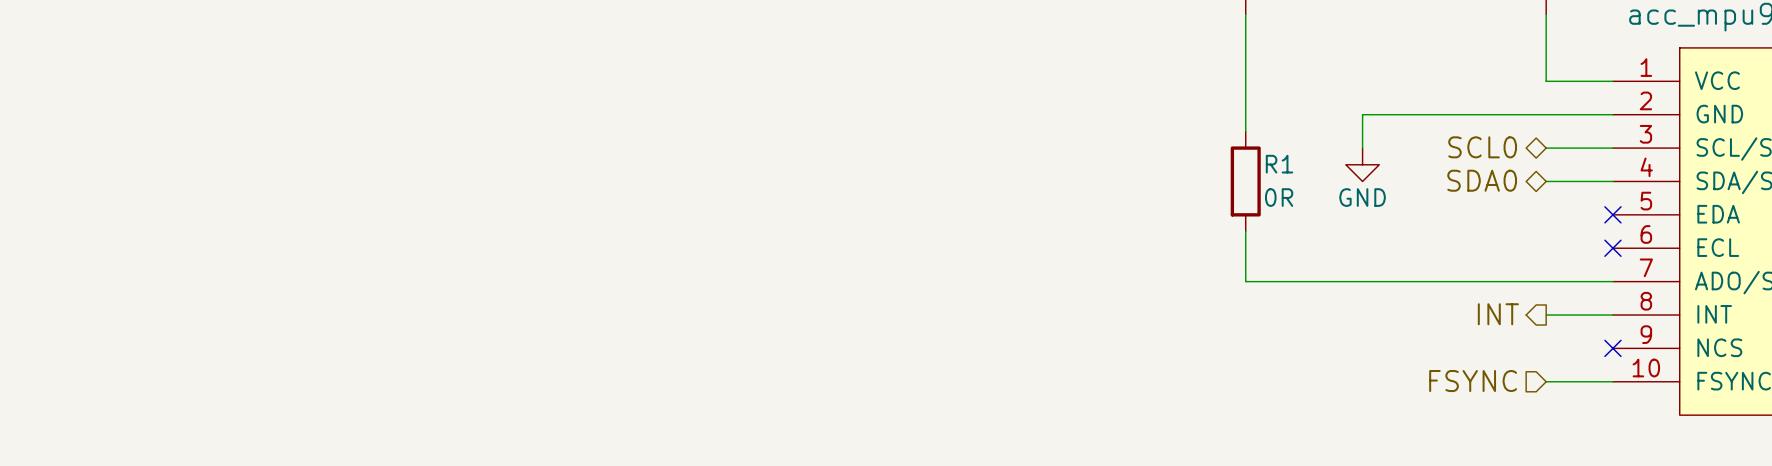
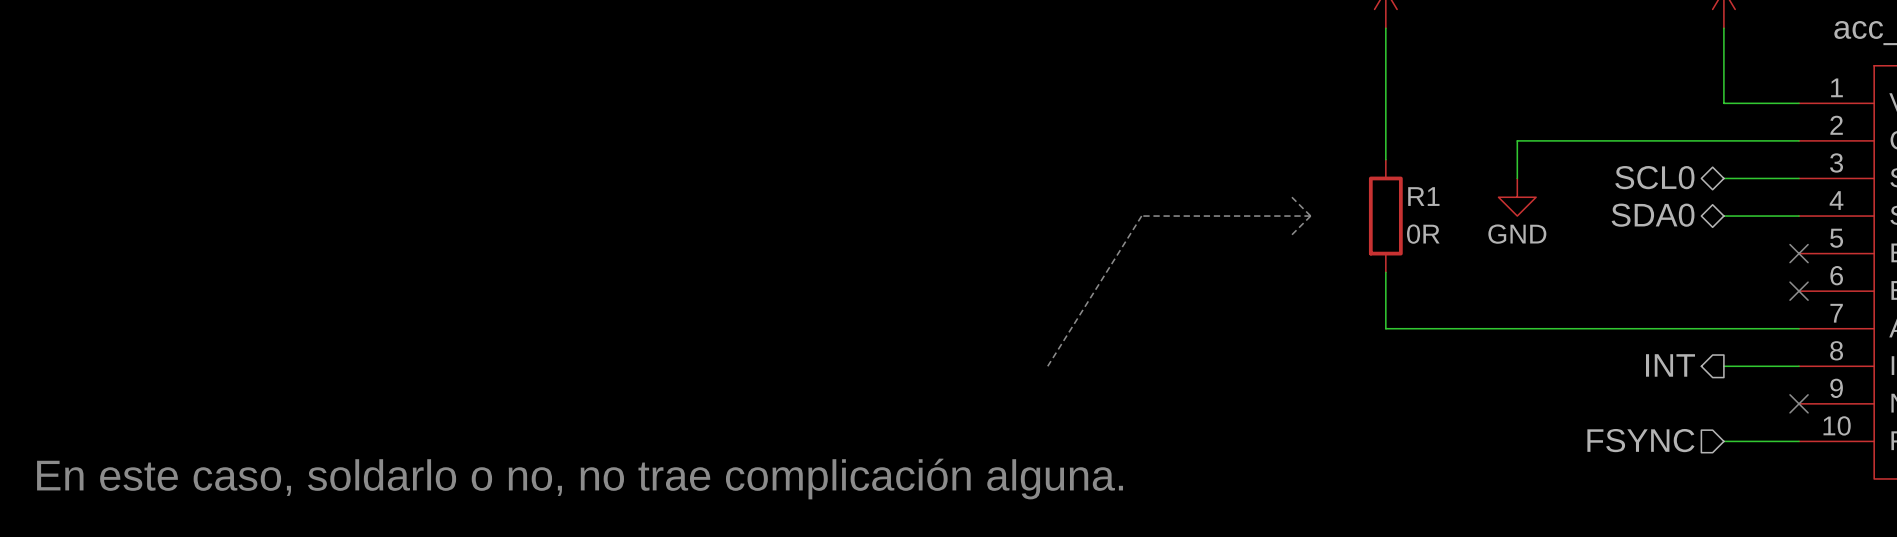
line: none -> (1291, 197) (1310, 216)
line: none -> (1310, 216) (1141, 216) (1047, 366)
line: none -> (1310, 216) (1291, 234)
text: none -> En este caso, soldarlo o no, no trae complicación alguna. (580, 479)

